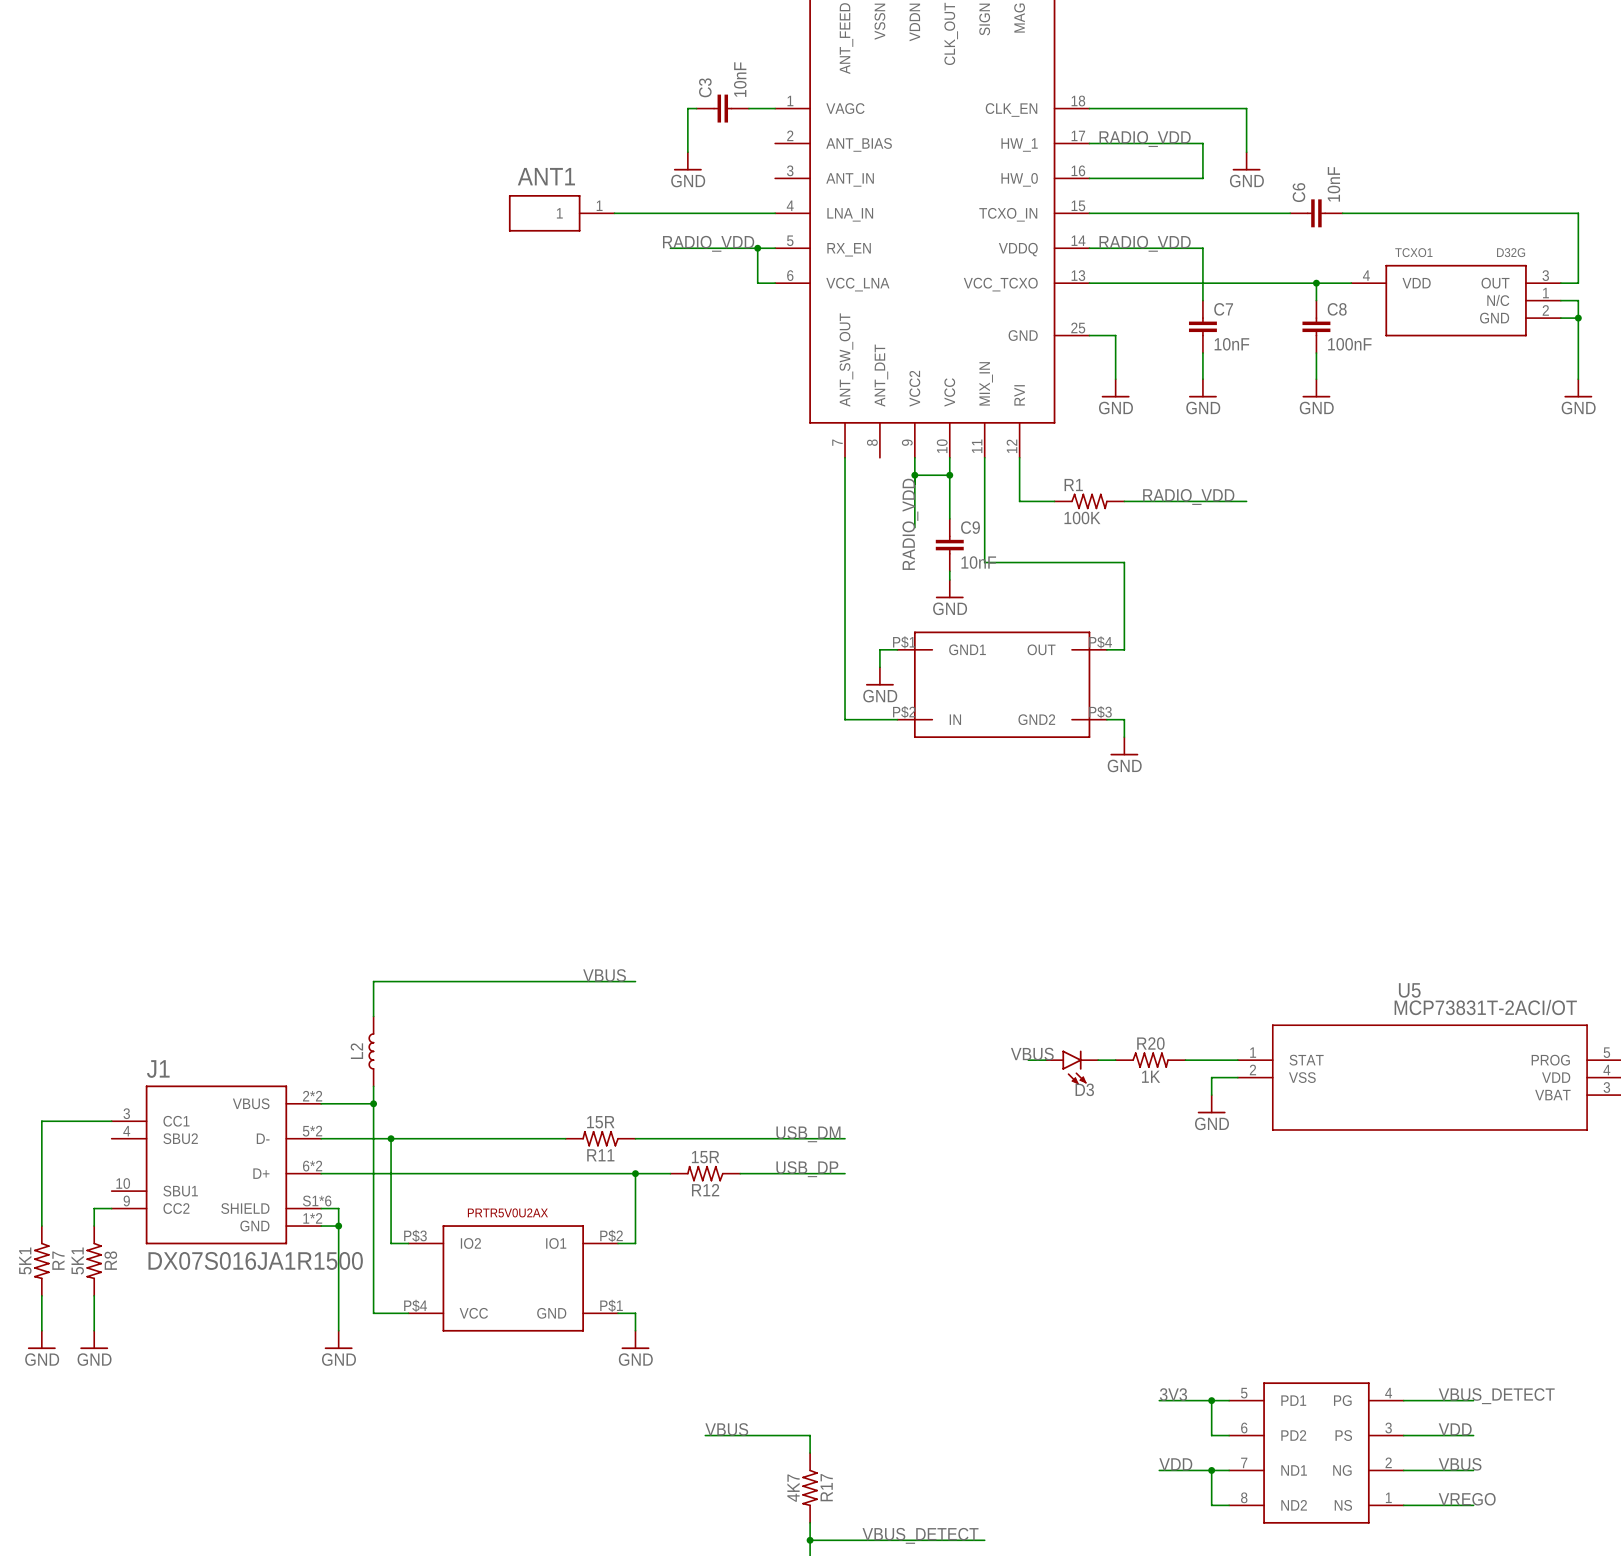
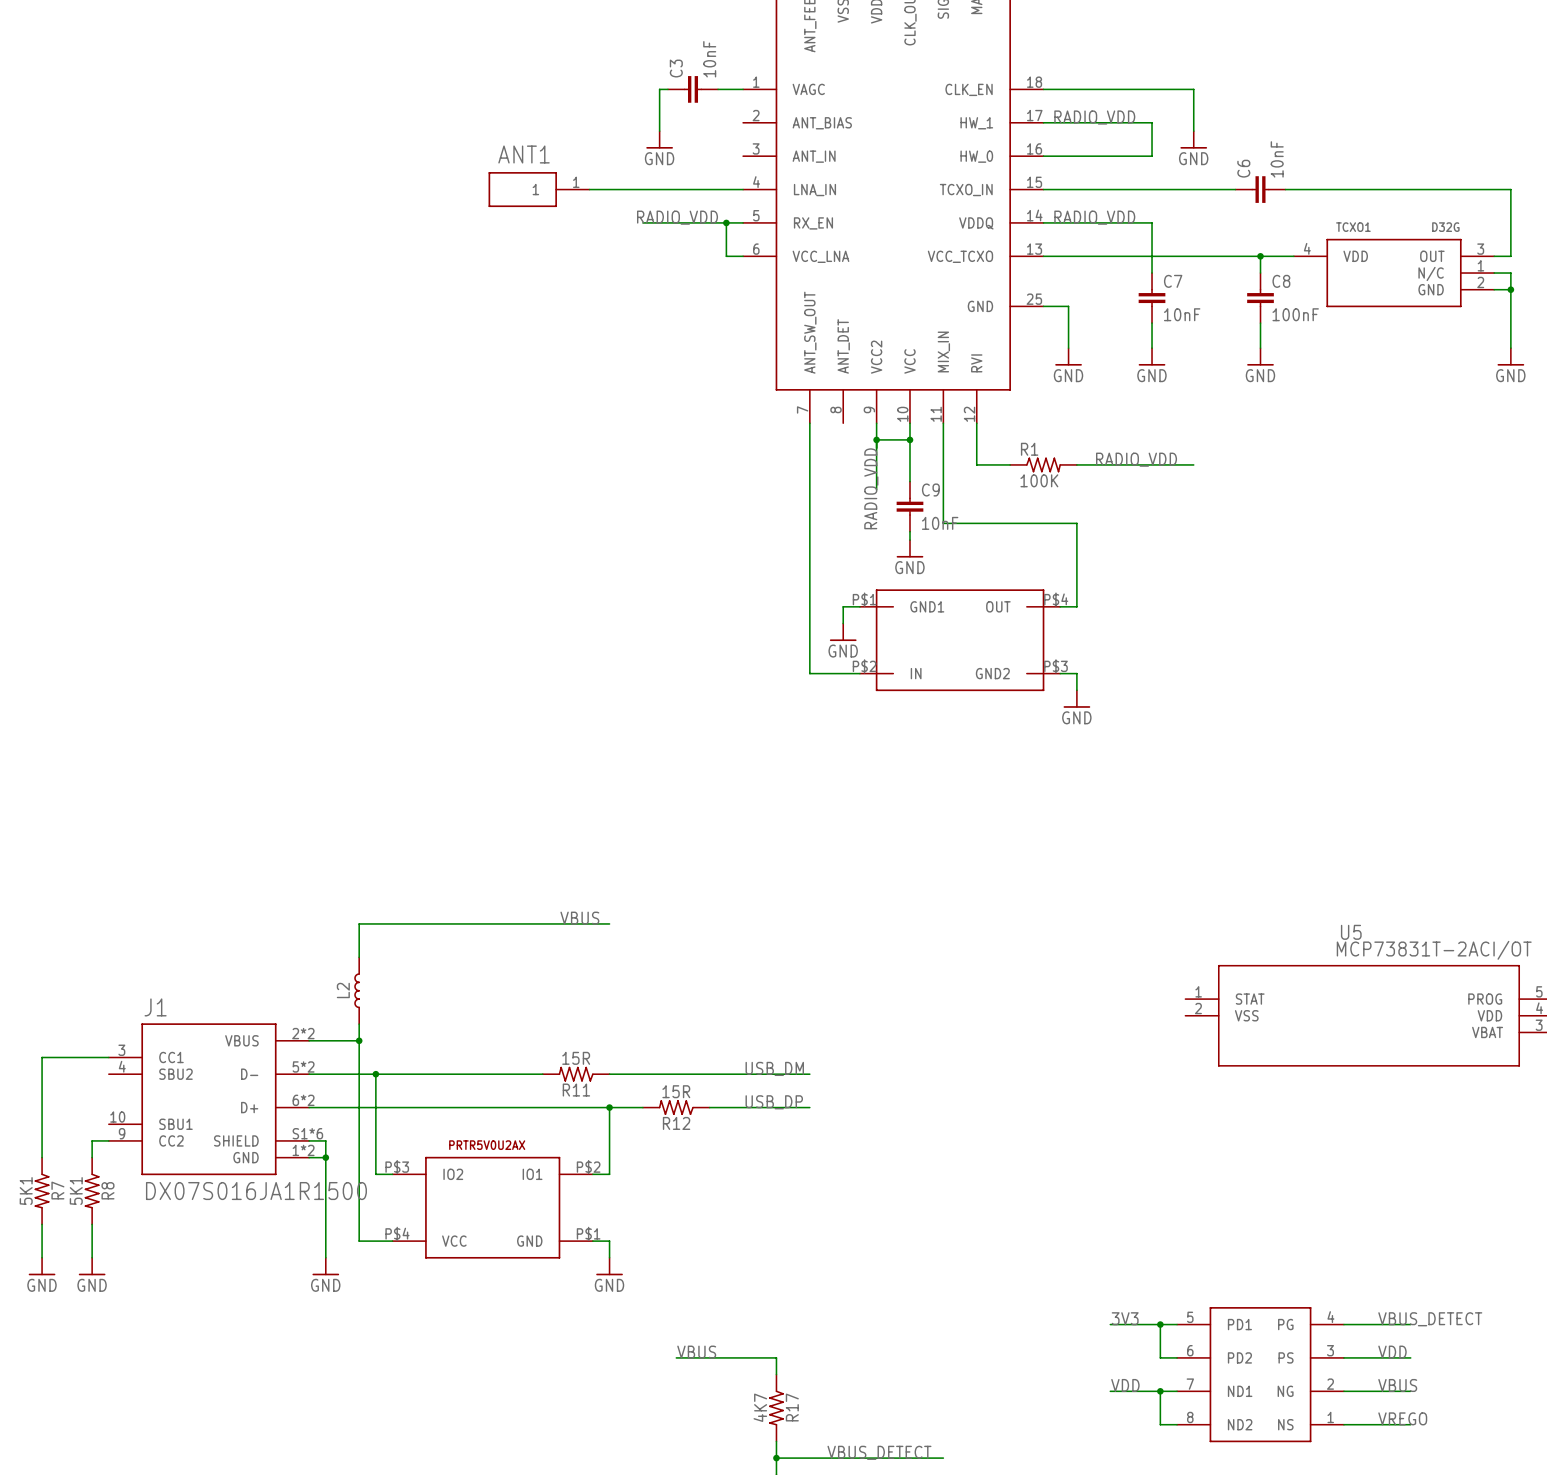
label: VBUS (1032, 1054) -> none
wire: (1028, 1060) (1045, 1060) -> none
wire: (1098, 1060) (1115, 1060) -> none
R20: 1K (1150, 1060) -> none
wire: (1185, 1060) (1237, 1060) -> none
D3: (1071, 1067) -> none
wire: (1237, 1077) (1211, 1077) (1211, 1095) -> none
power symbol: GND (1211, 1104) -> none

